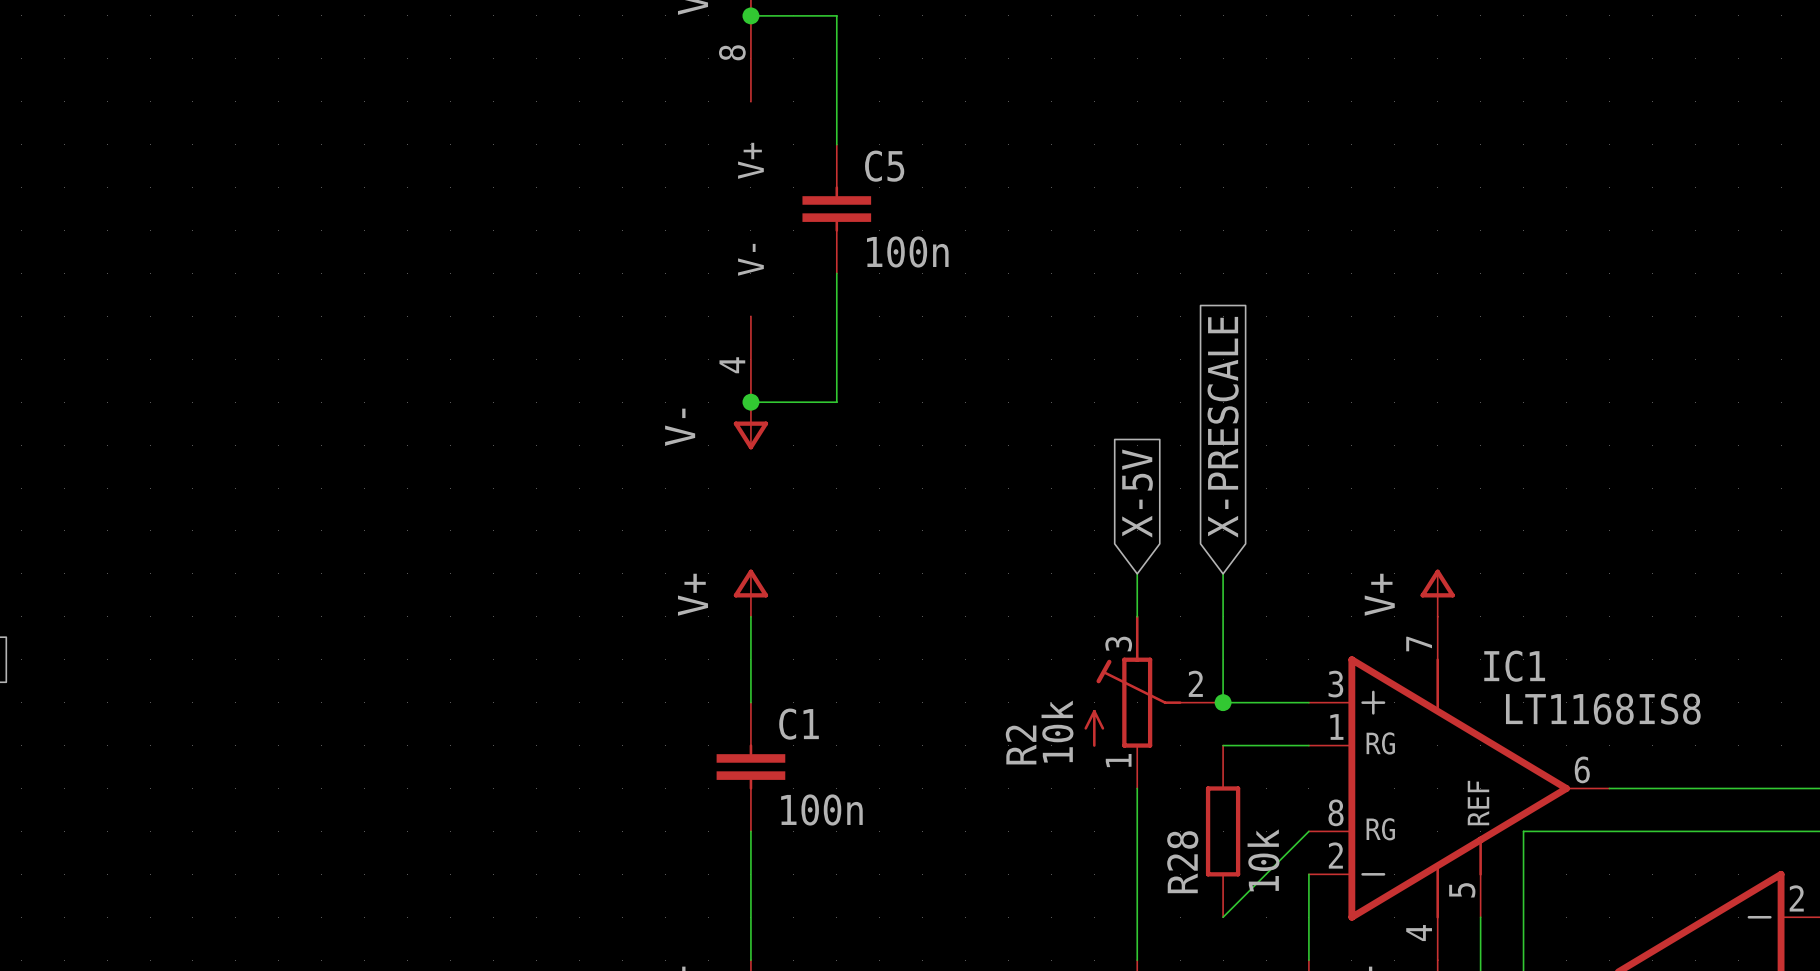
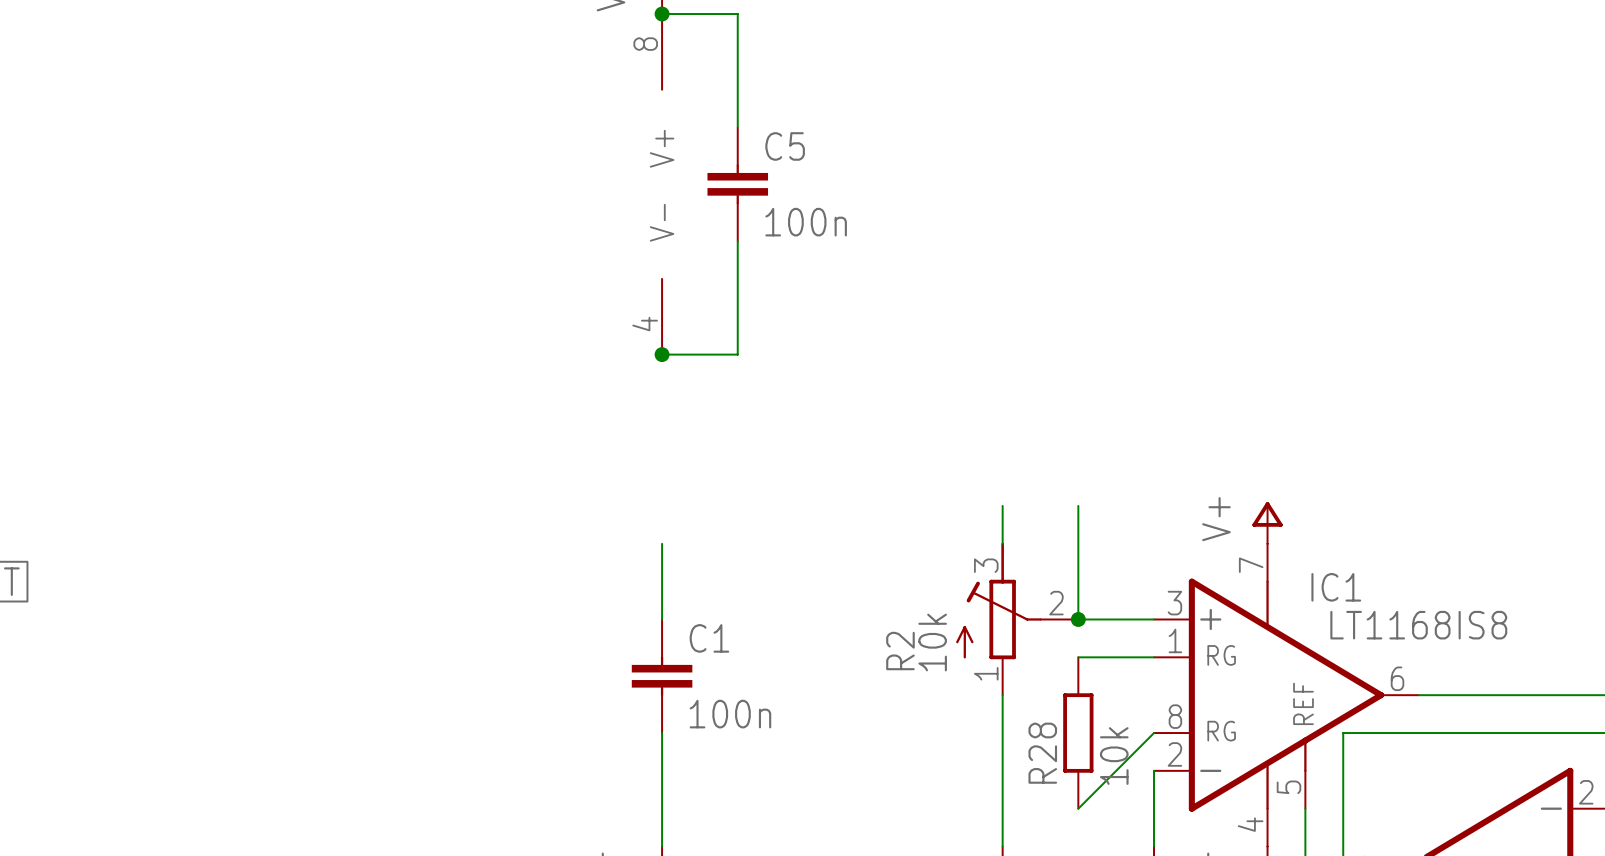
power symbol: V- (750, 425) -> none
global label: X-PRESCALE (1223, 427) -> none
global label: X-5V (1137, 493) -> none
power symbol: V+ (750, 593) -> none

